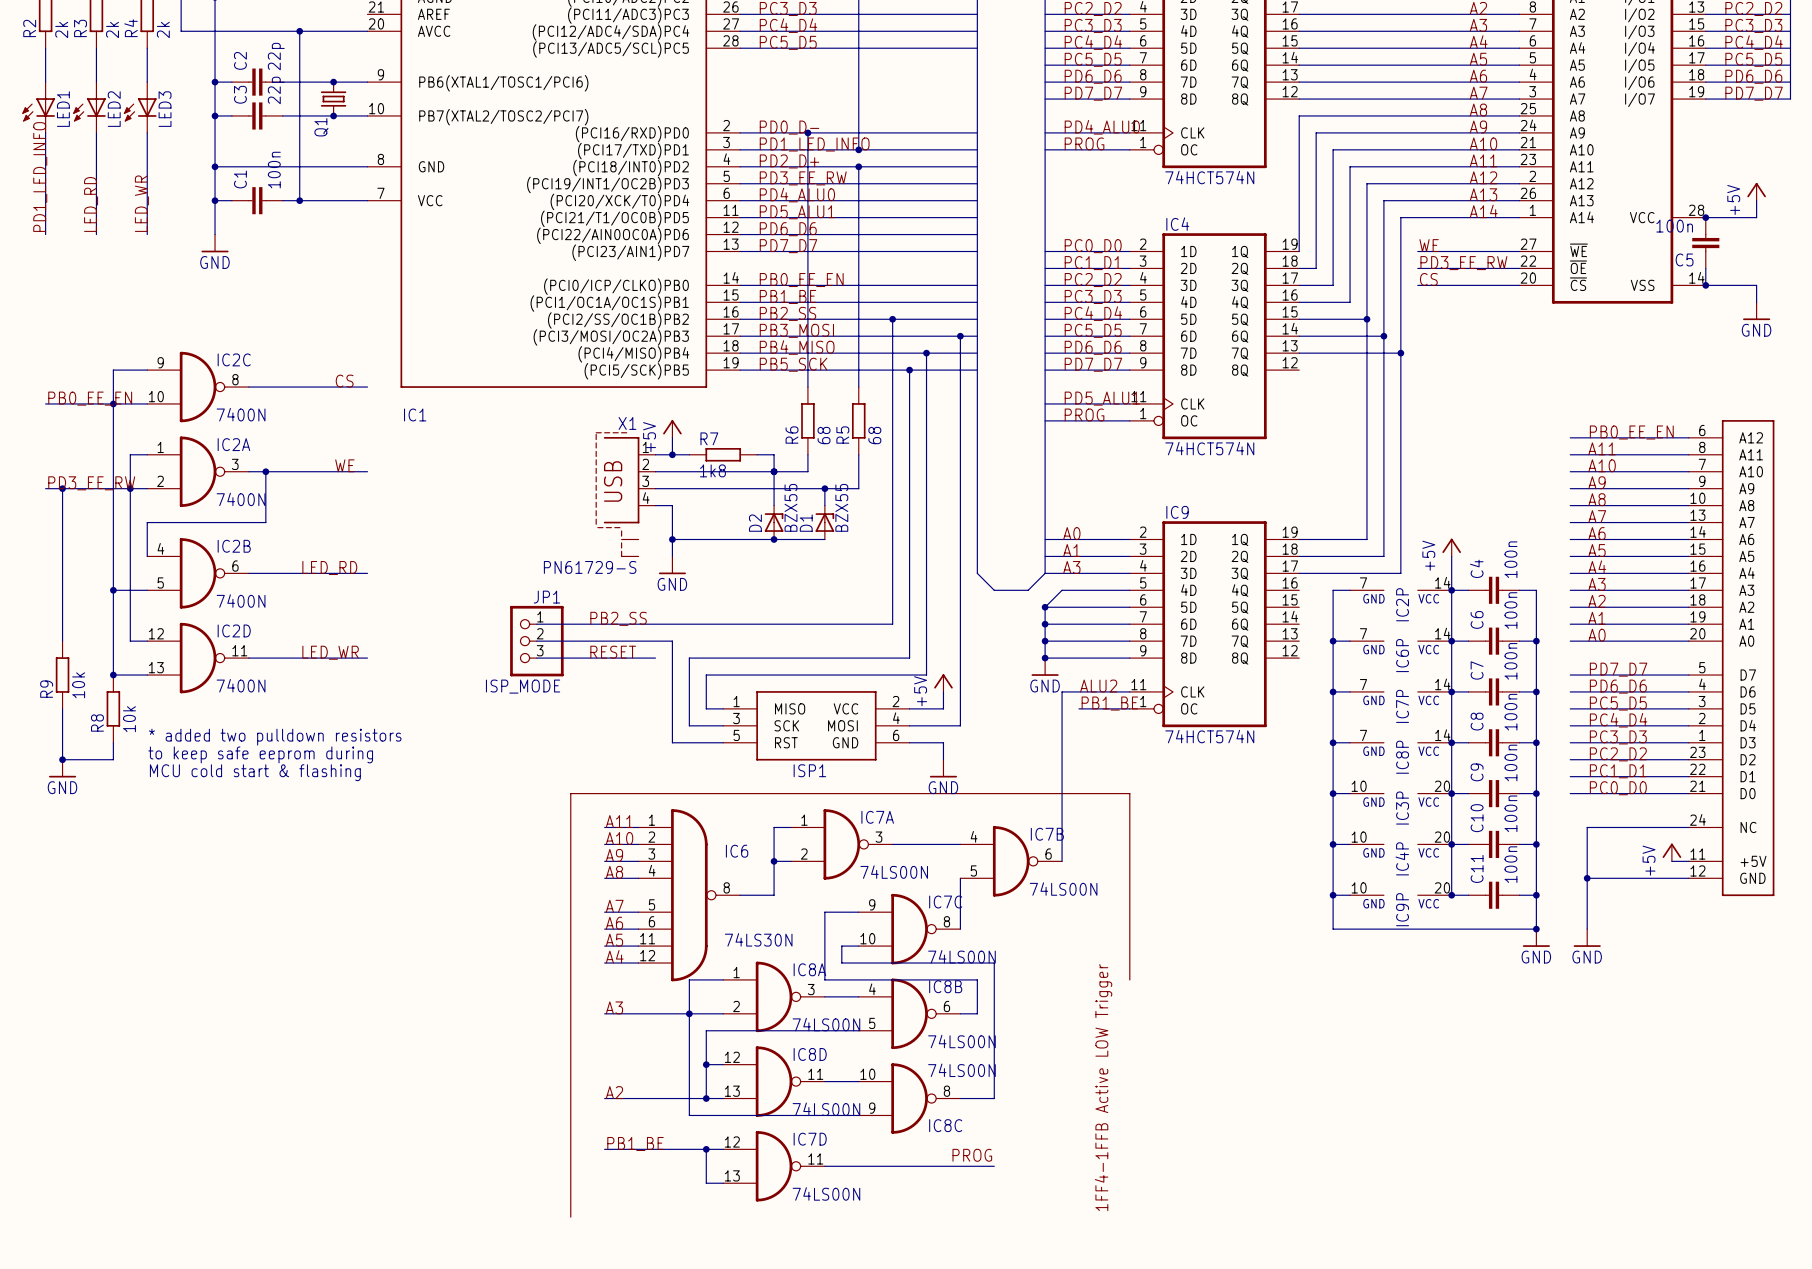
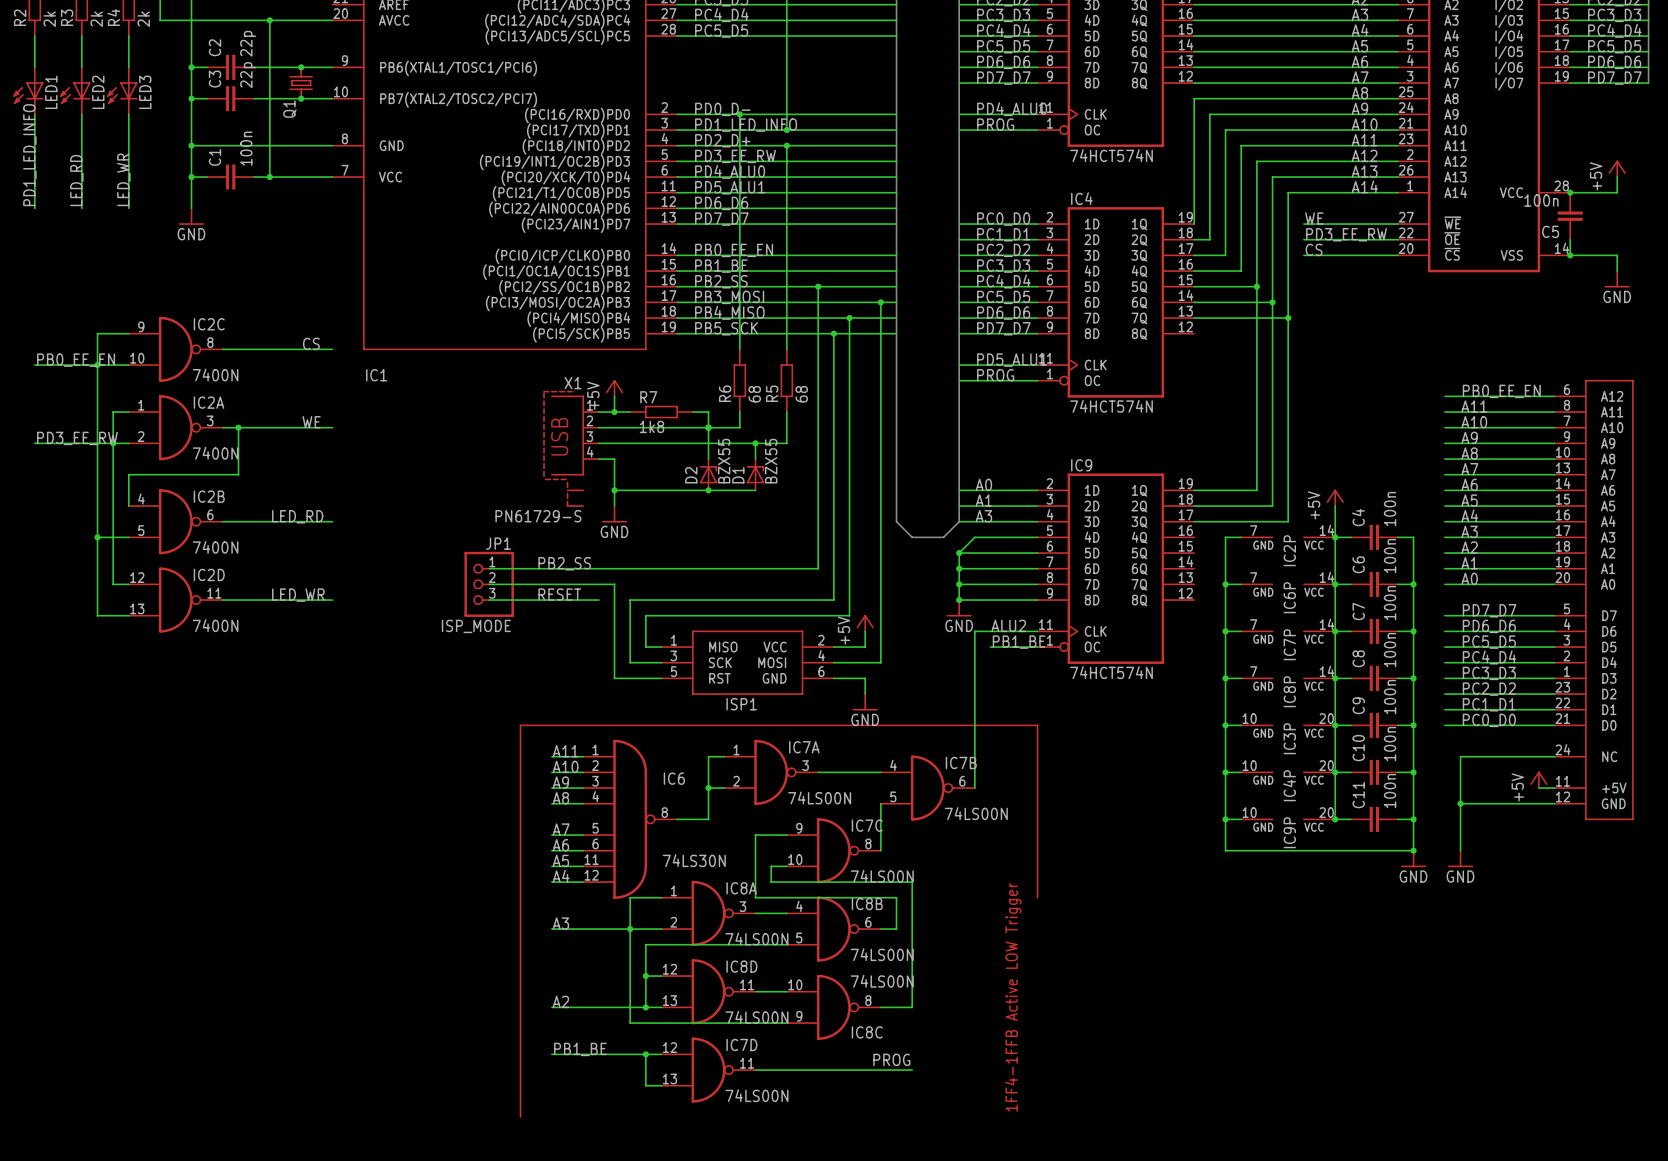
wire: (62, 488) (62, 641) -> none
junction: (62, 488) -> none
R9: 10k (62, 675) -> none
junction: (113, 675) -> none
wire: (62, 708) (62, 759) (113, 759) (113, 742) -> none
R8: 10k (113, 708) -> none
text: * added two pulldown resistors (275, 737) -> none
text: to keep safe eeprom during (260, 754) -> none
junction: (62, 759) -> none
power symbol: GND (62, 768) -> none
text: MCU cold start & flashing (255, 772) -> none

